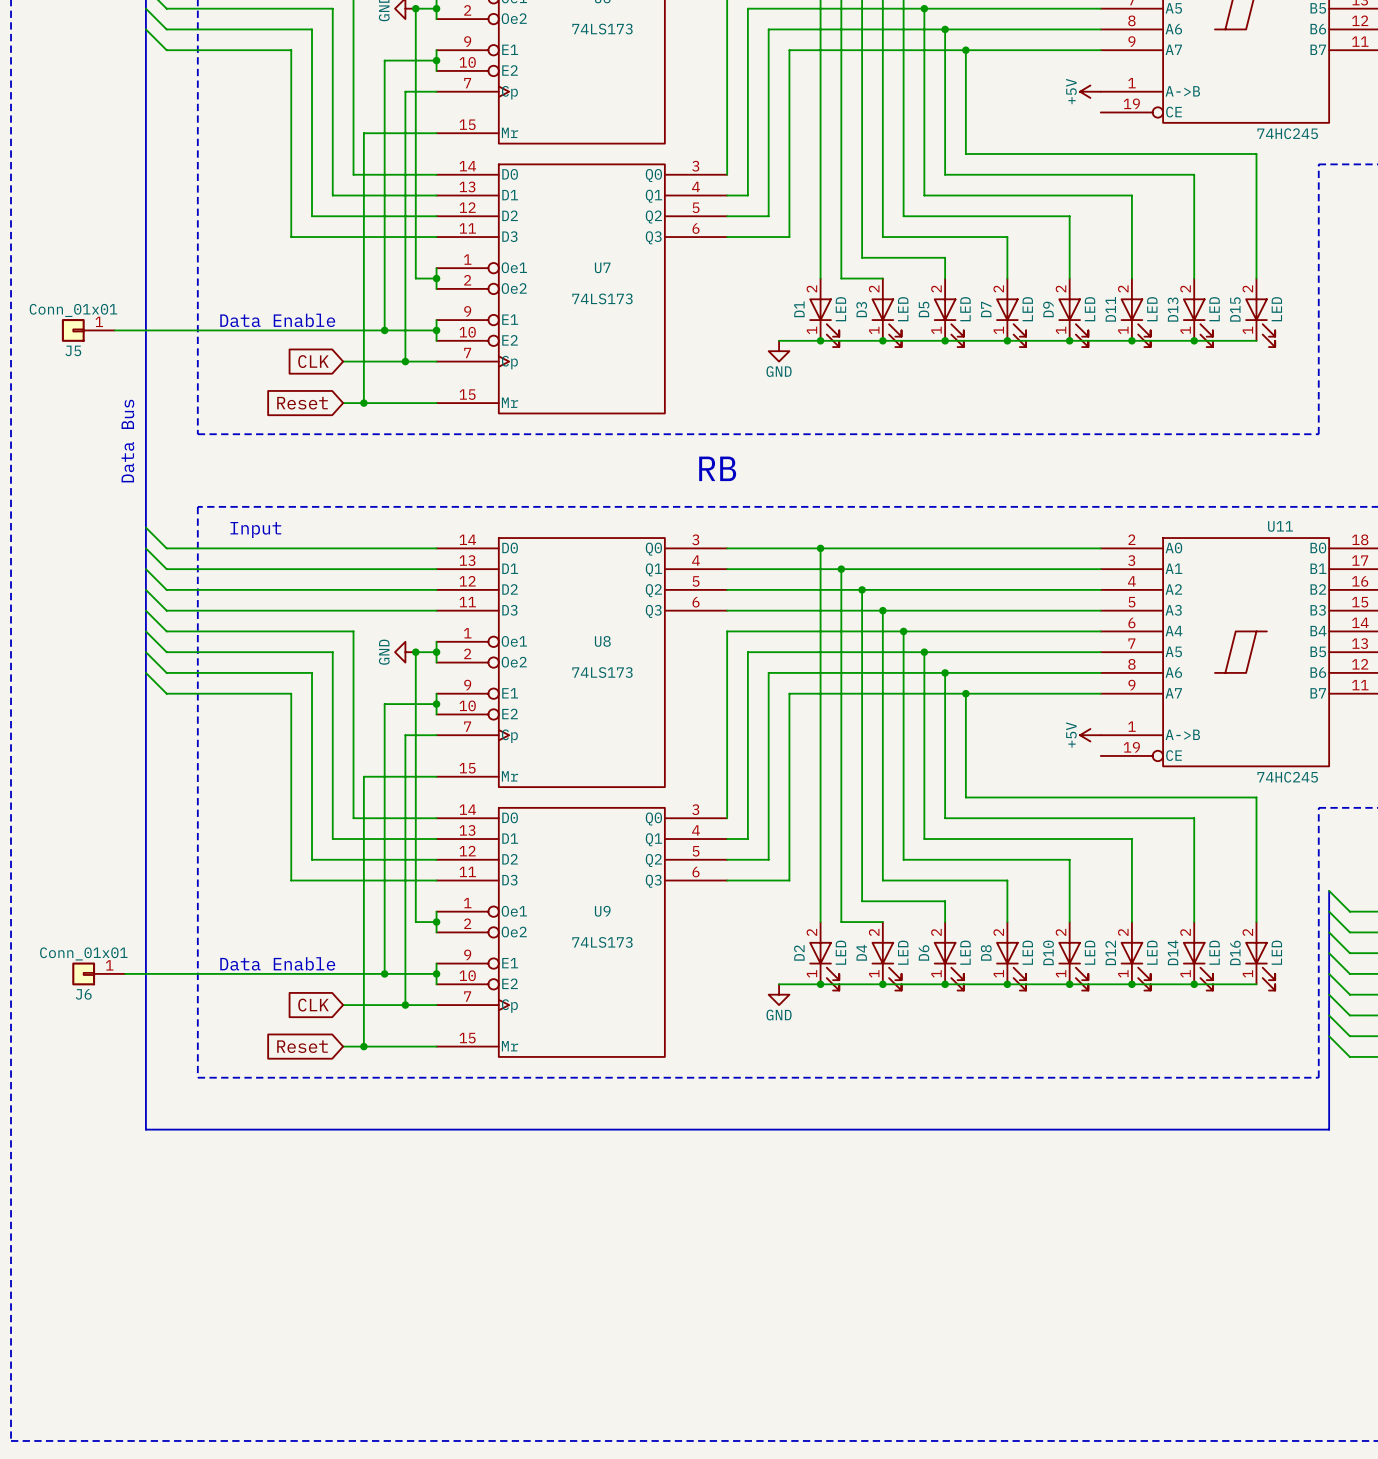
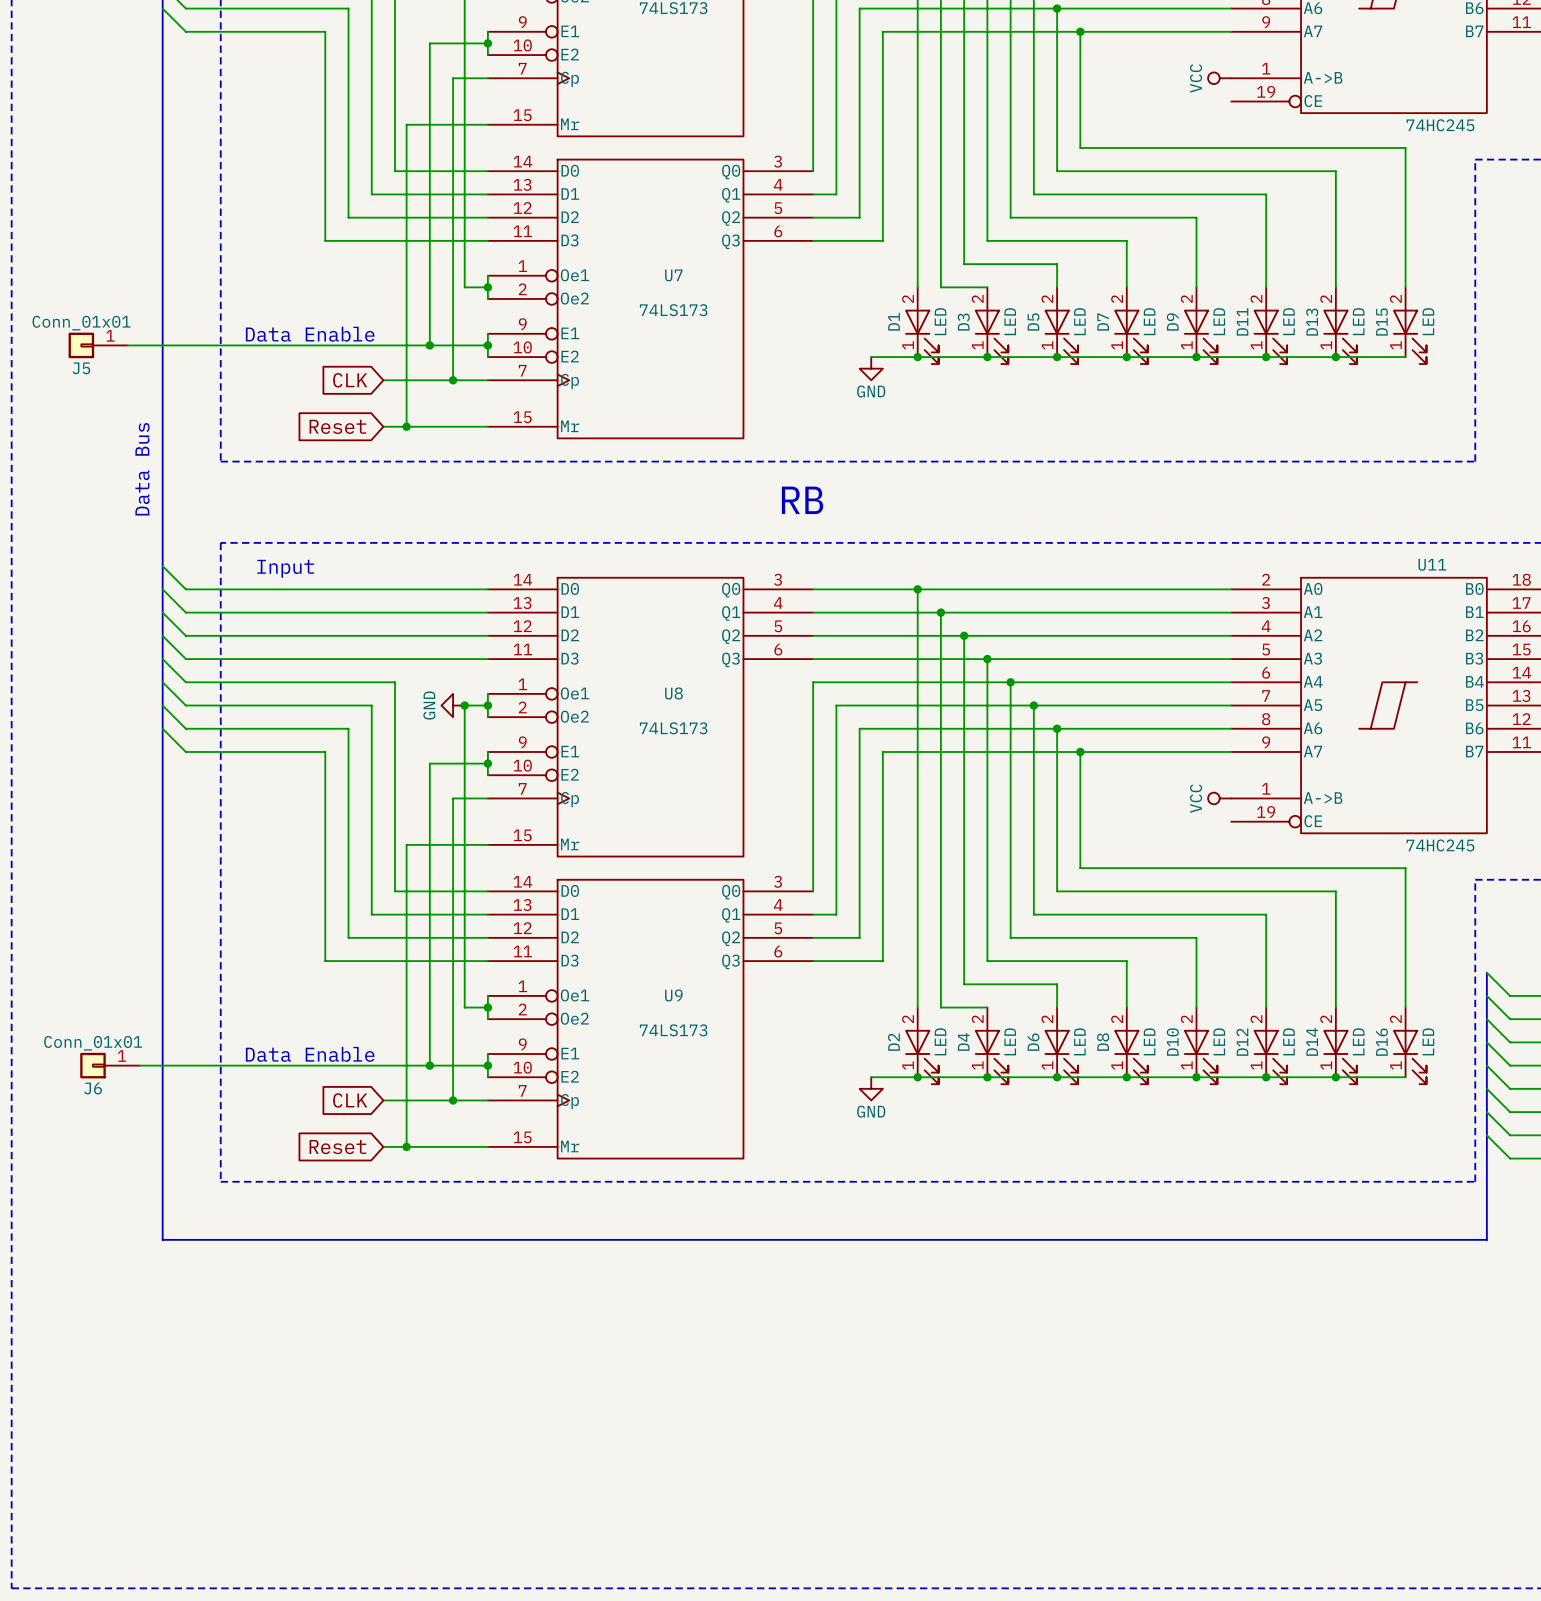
power symbol: +5V (1090, 91) -> VCC (1219, 78)
power symbol: +5V (1090, 735) -> VCC (1219, 798)

